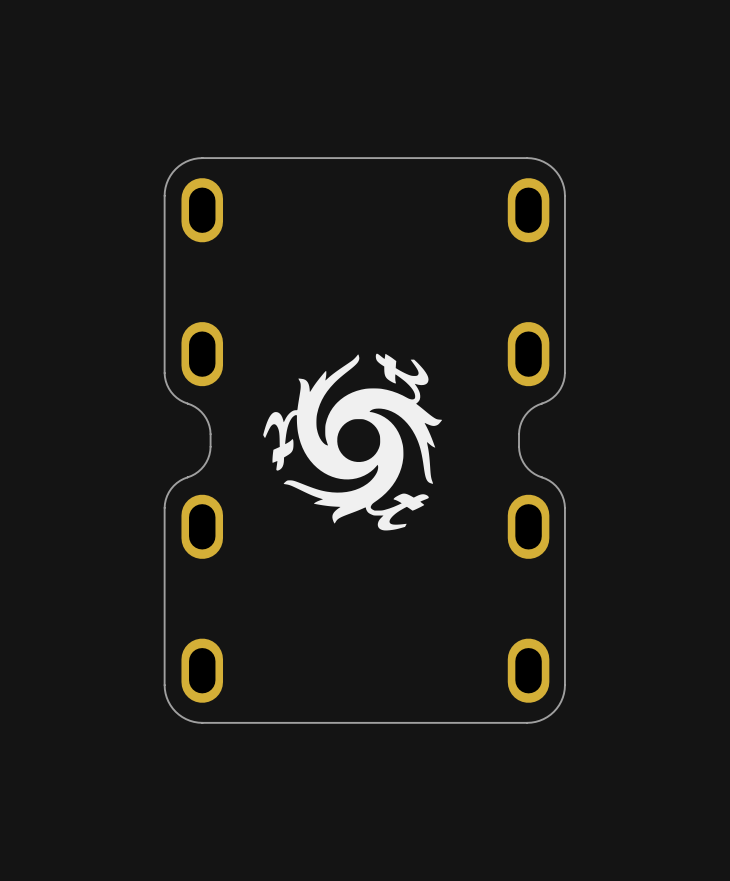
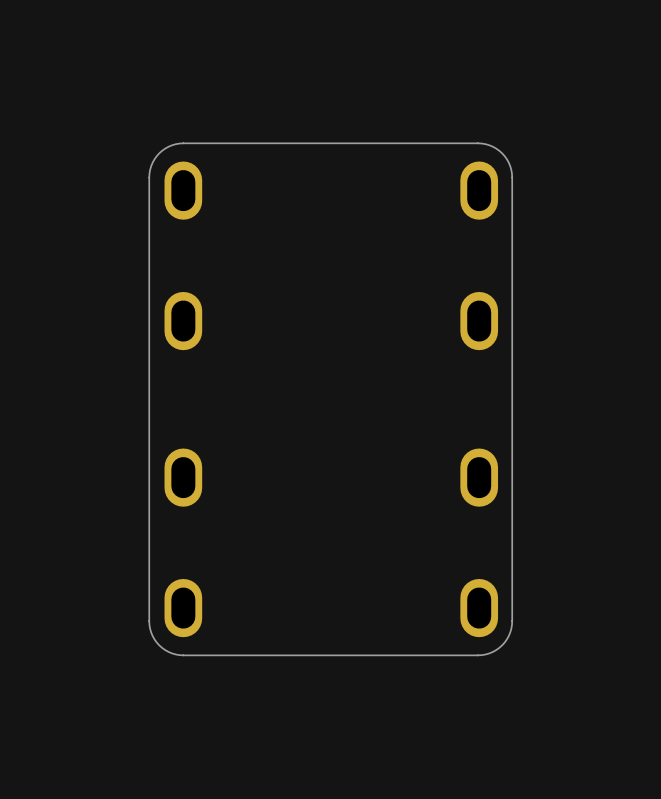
drawing: [263, 353, 443, 531] -> none
board edge: (164, 373) (165, 381) (171, 392) (180, 400) (201, 411) (208, 422) (210, 434) (210, 450) (206, 462) (198, 471) (173, 485) (167, 495) (164, 507) -> (149, 338) (149, 460)
board edge: (564, 373) (563, 381) (558, 392) (549, 400) (528, 411) (521, 422) (519, 434) (519, 450) (523, 462) (531, 471) (555, 485) (562, 495) (564, 507) -> (512, 338) (512, 460)

